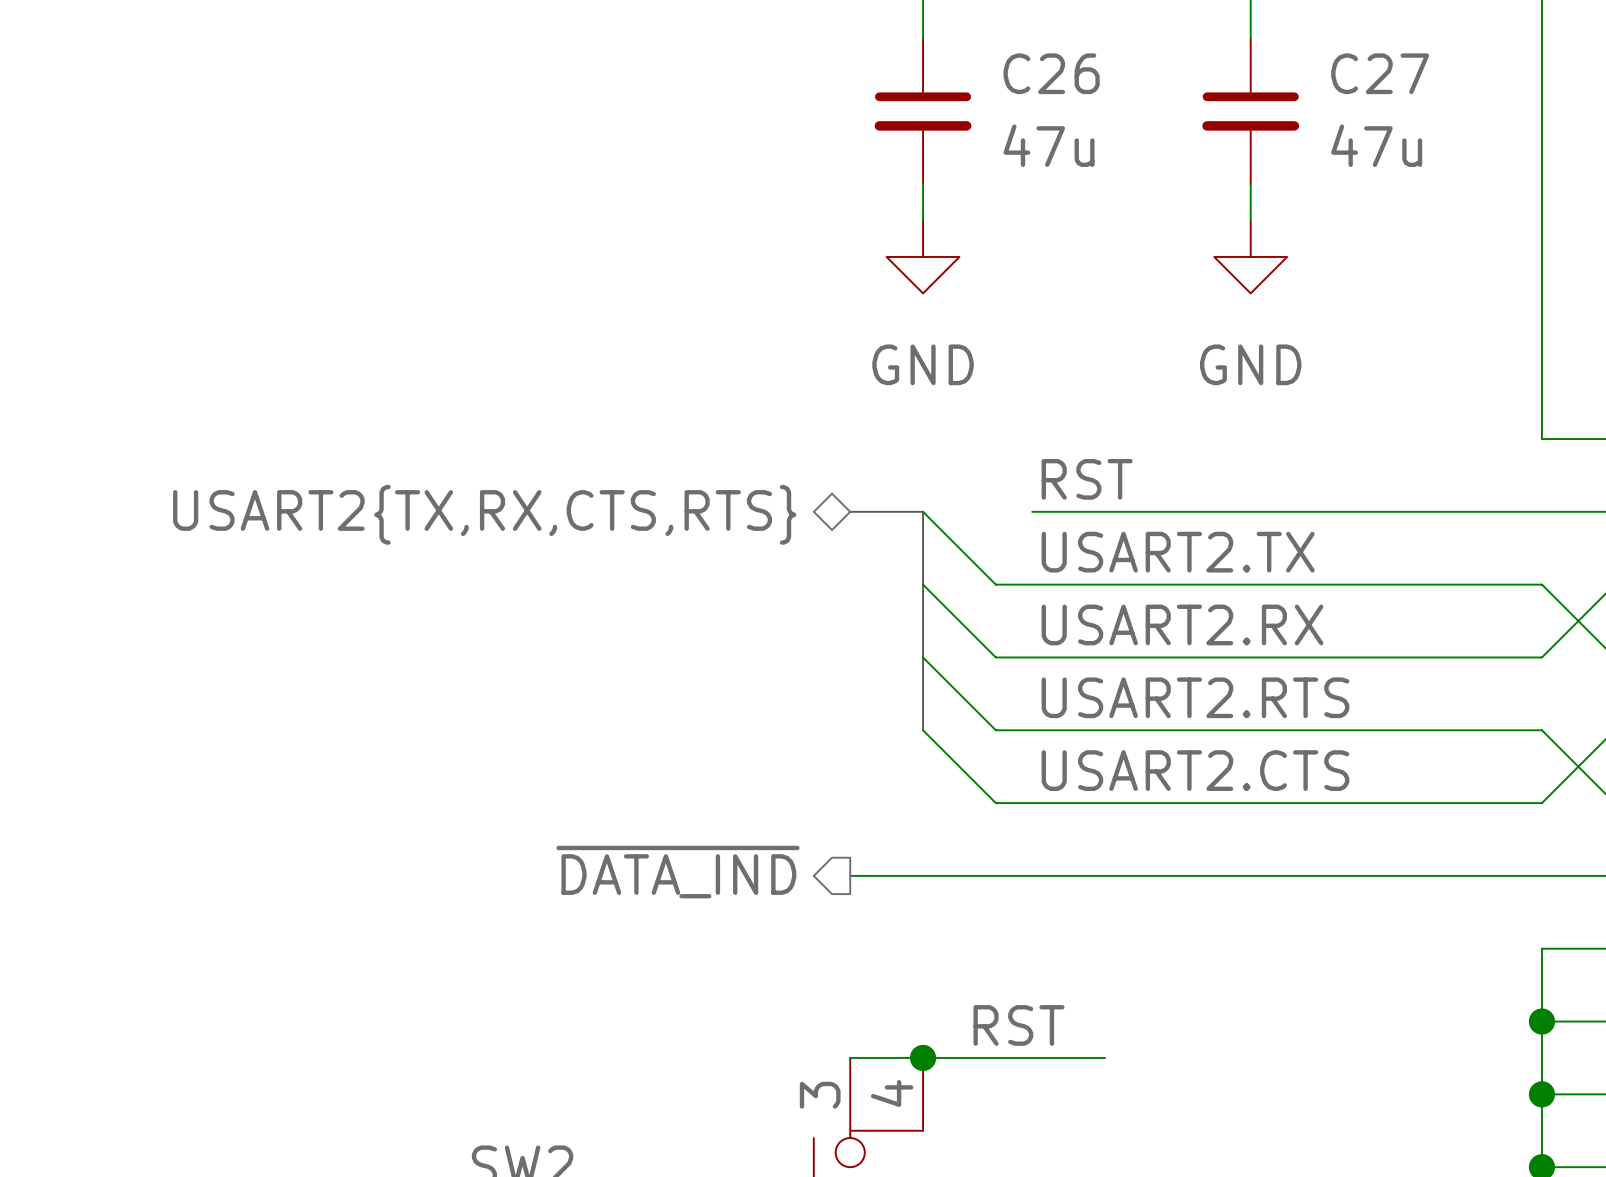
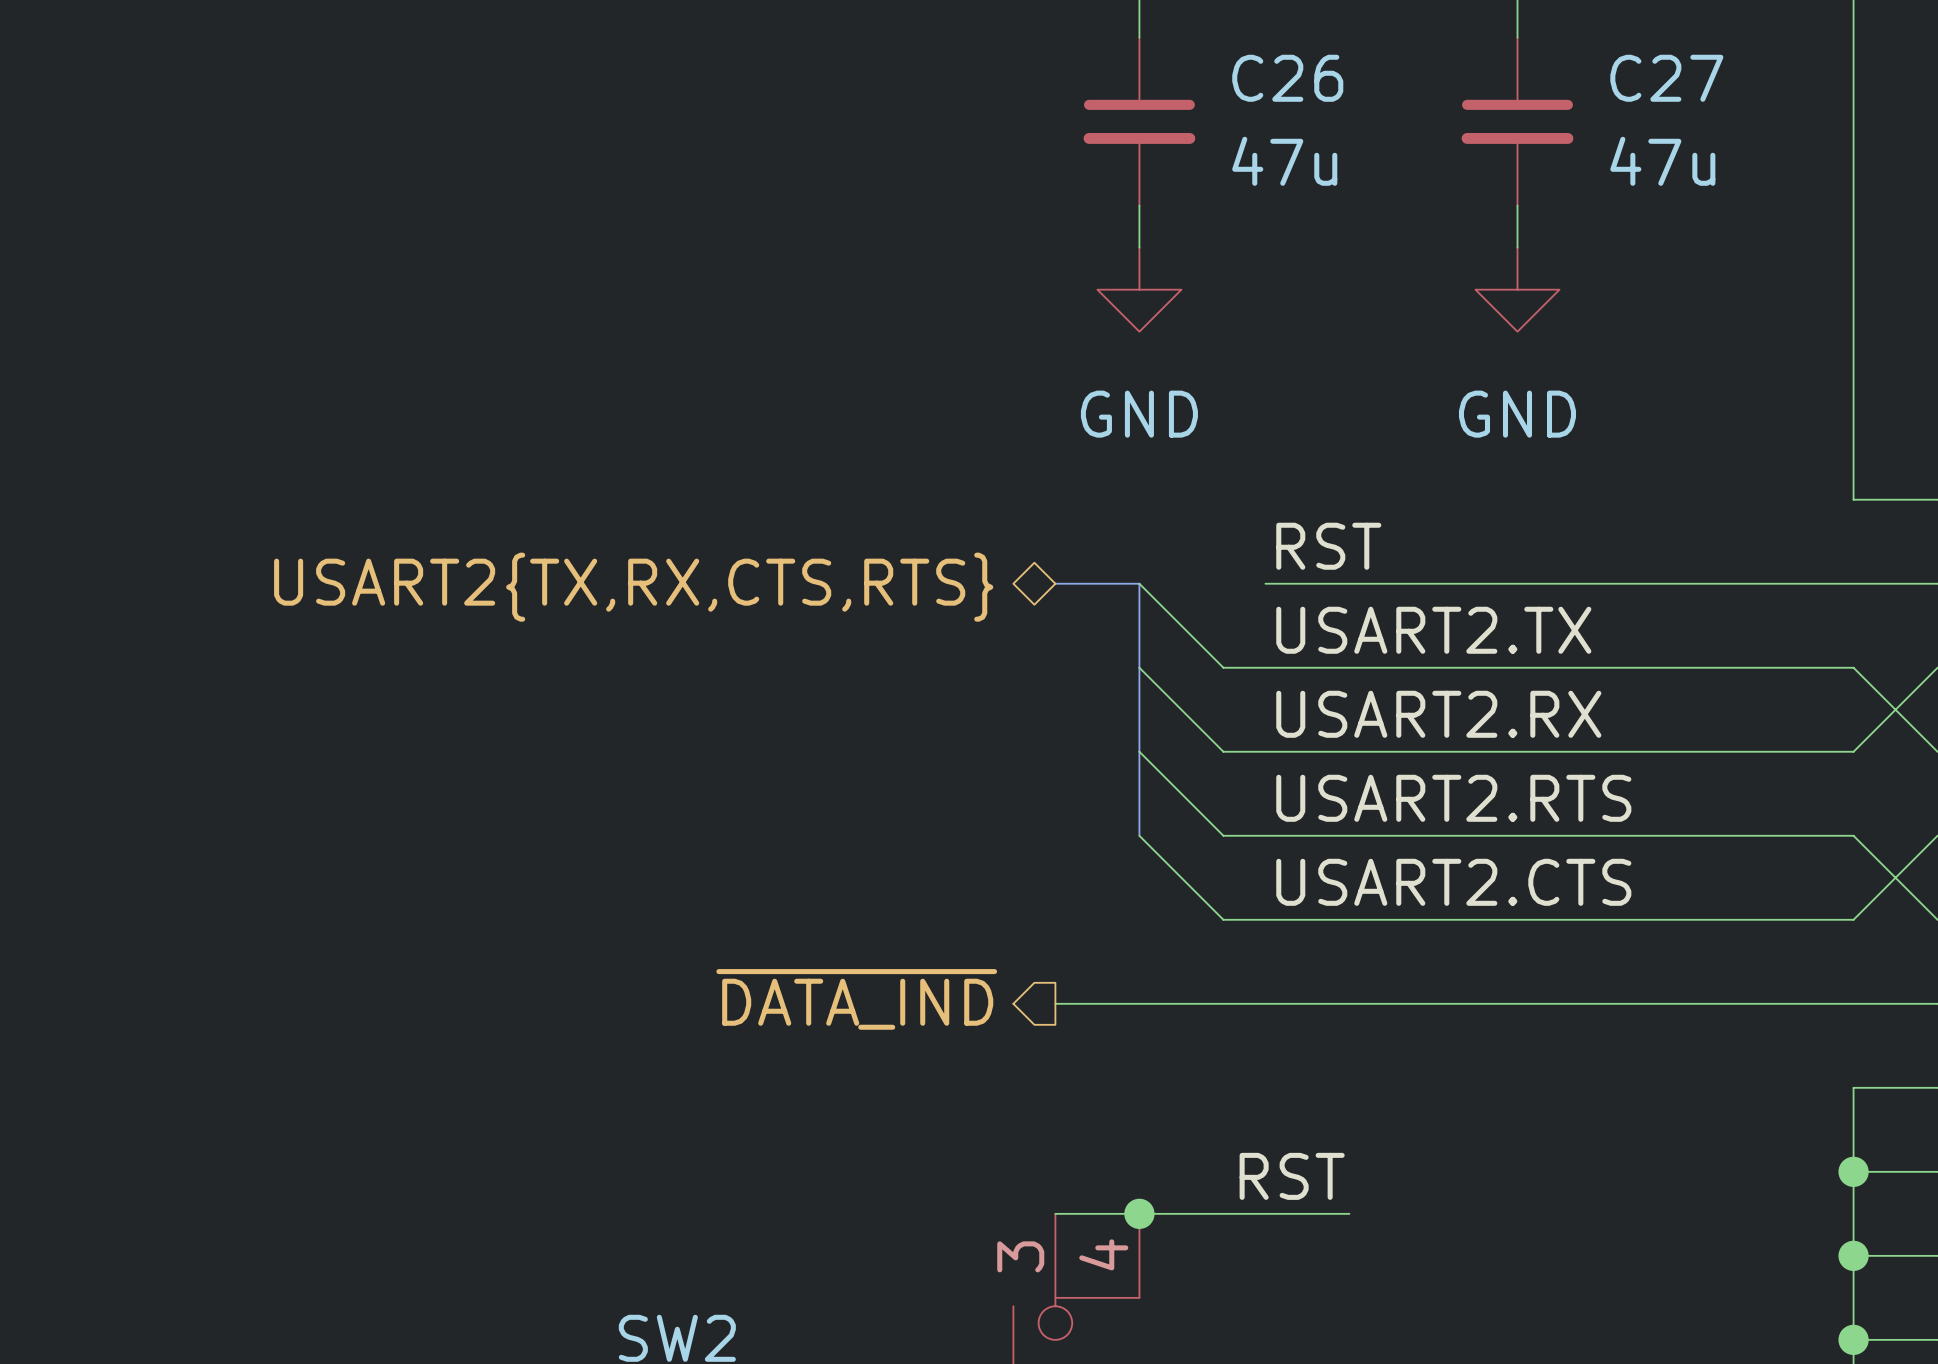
label position: RST (1018, 1025) -> RST (1292, 1176)

